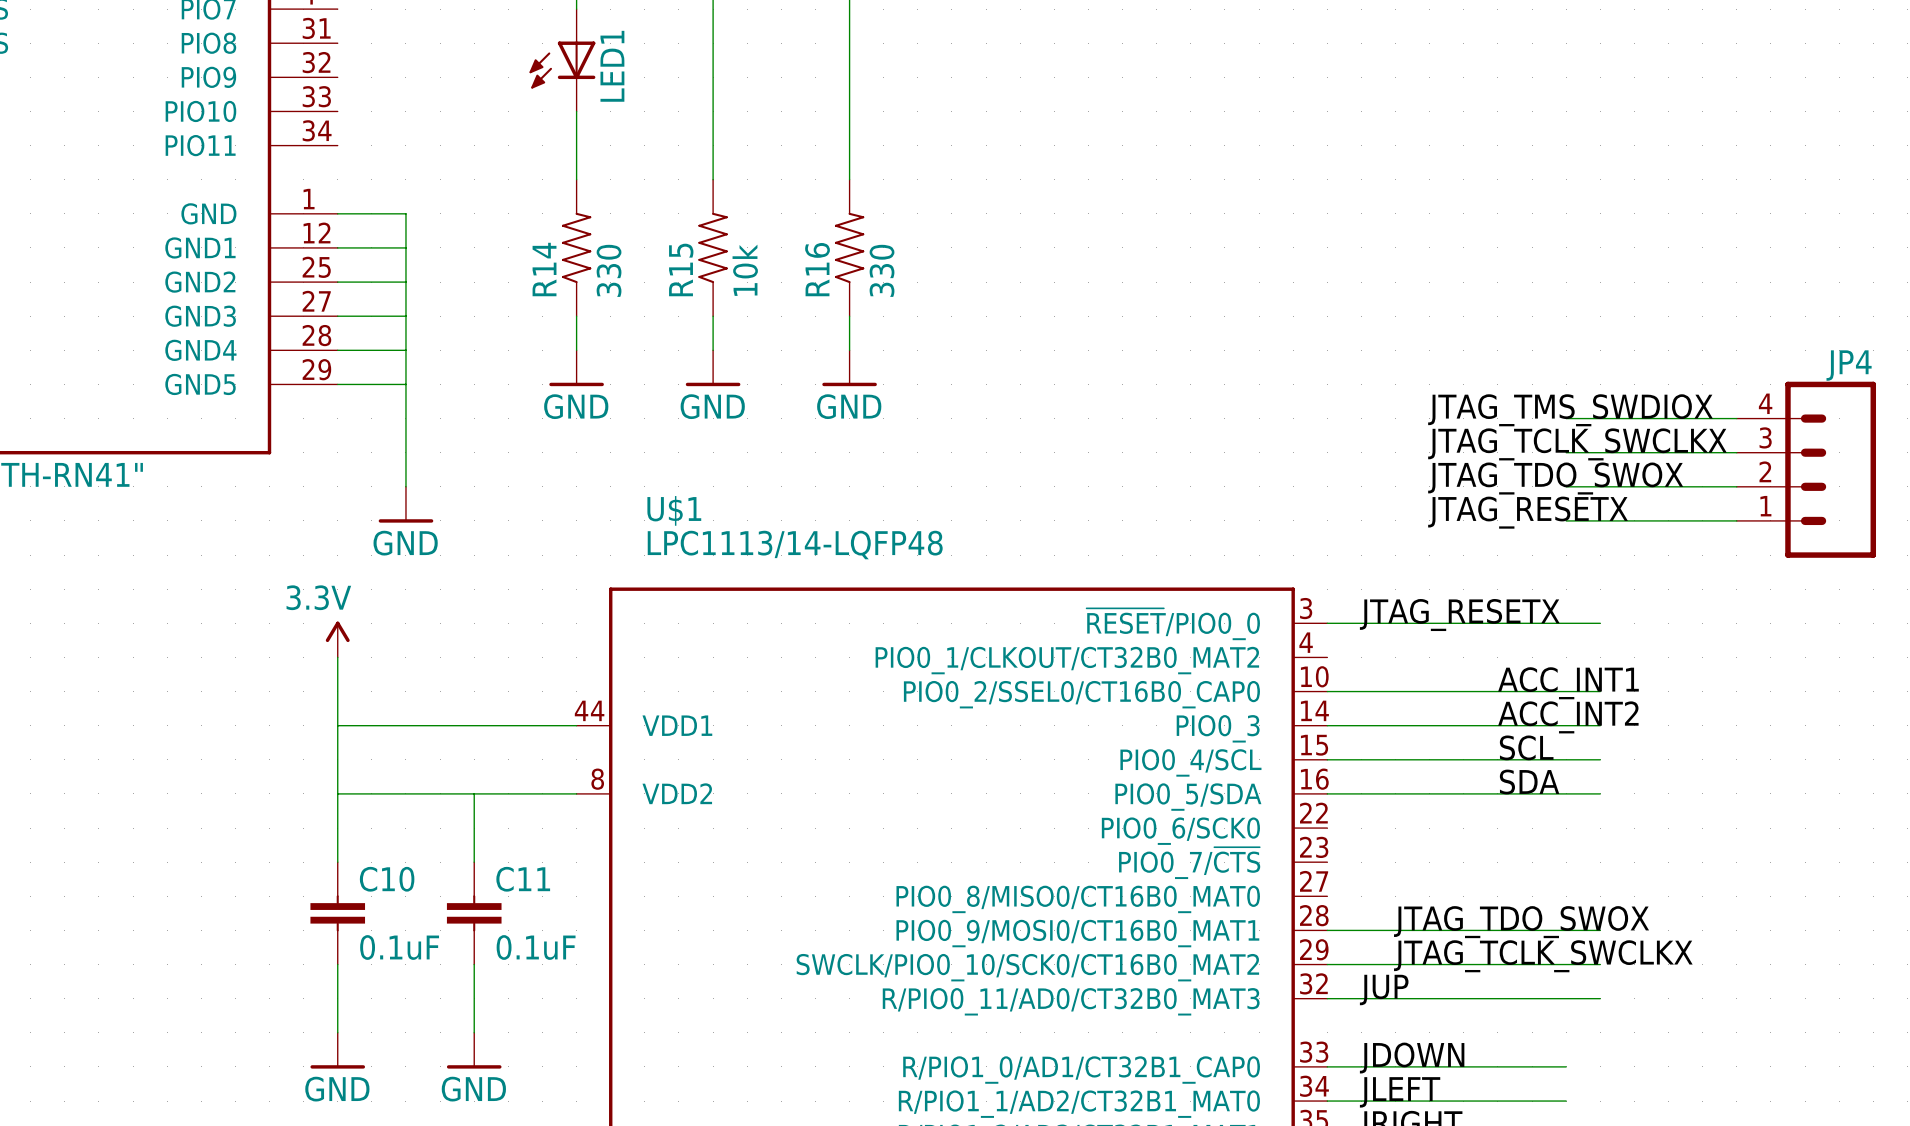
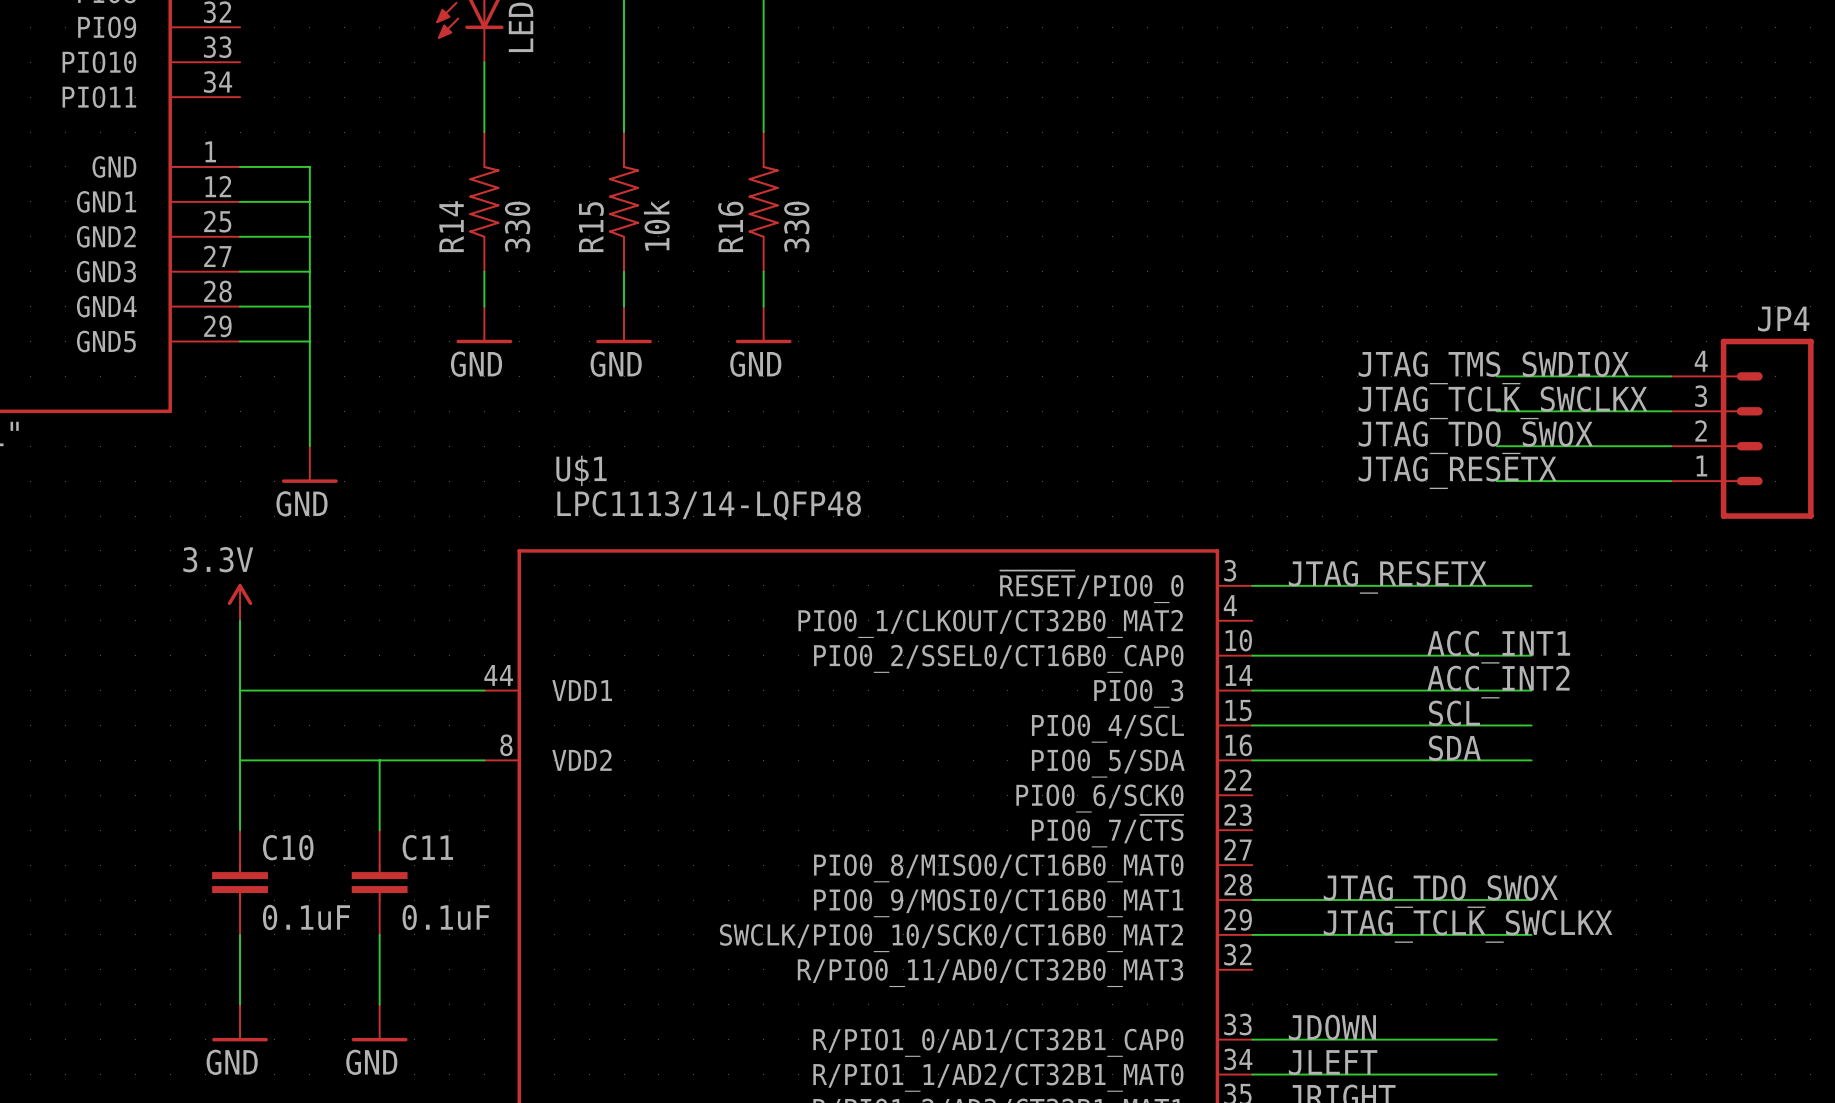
label: JUP (1384, 990) -> none
wire: (1327, 998) (1600, 998) -> none

